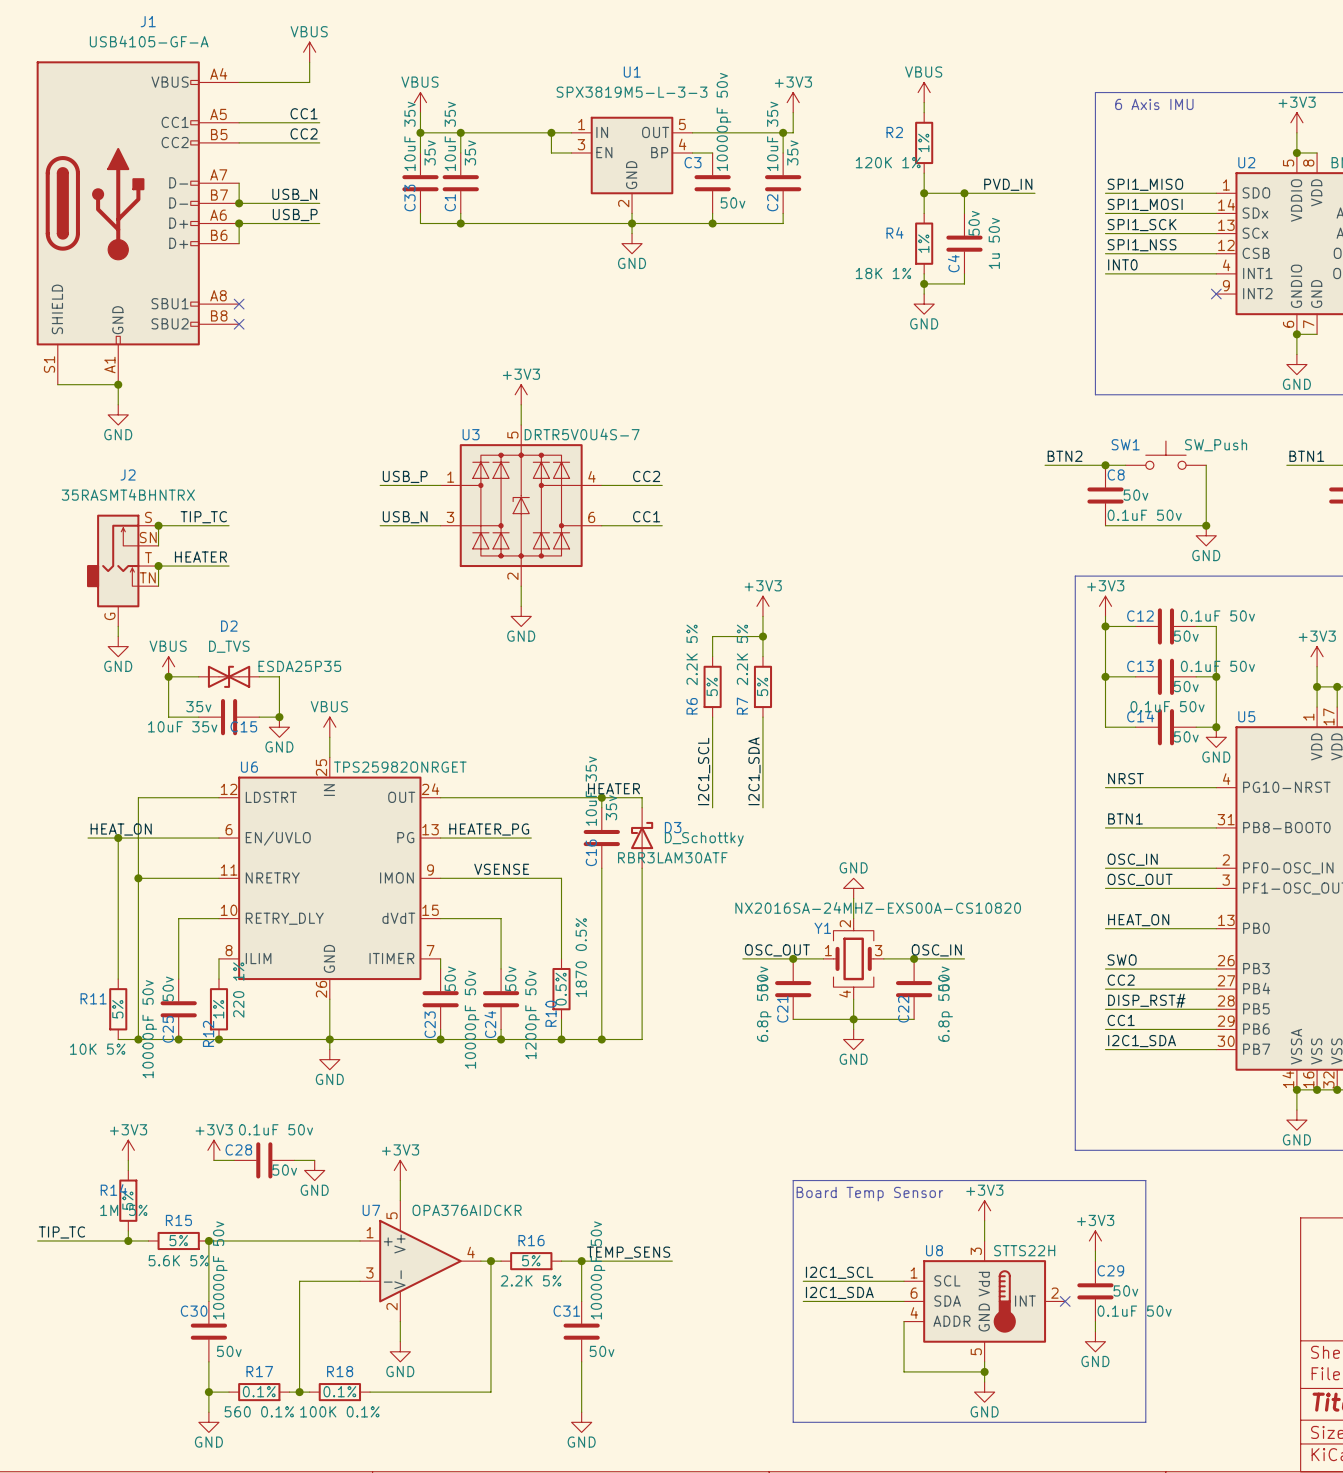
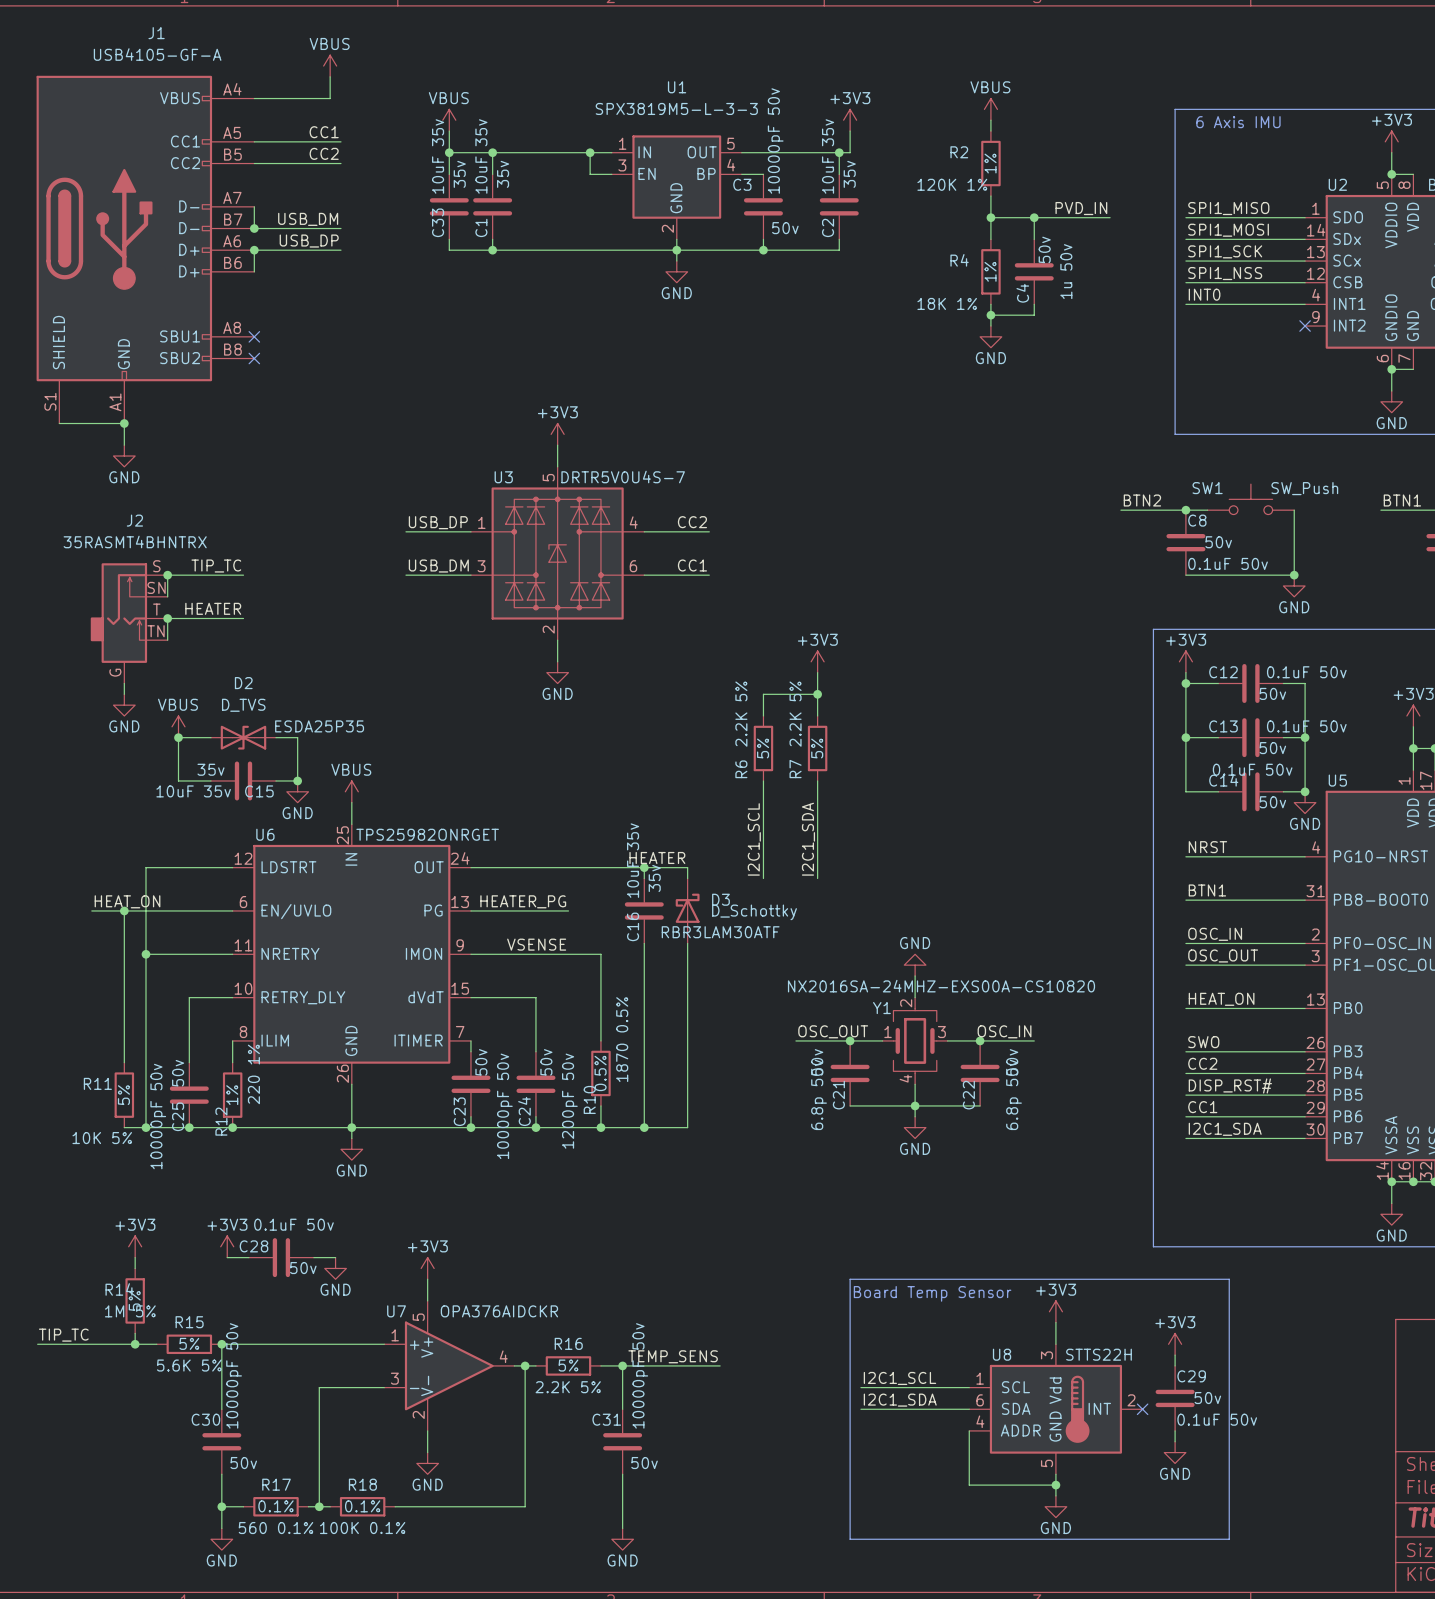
label: USB_N (294, 194) -> USB_DM (308, 219)
label: USB_P (295, 214) -> USB_DP (309, 241)
label: USB_P (405, 476) -> USB_DP (438, 522)
label: USB_N (405, 517) -> USB_DM (438, 566)

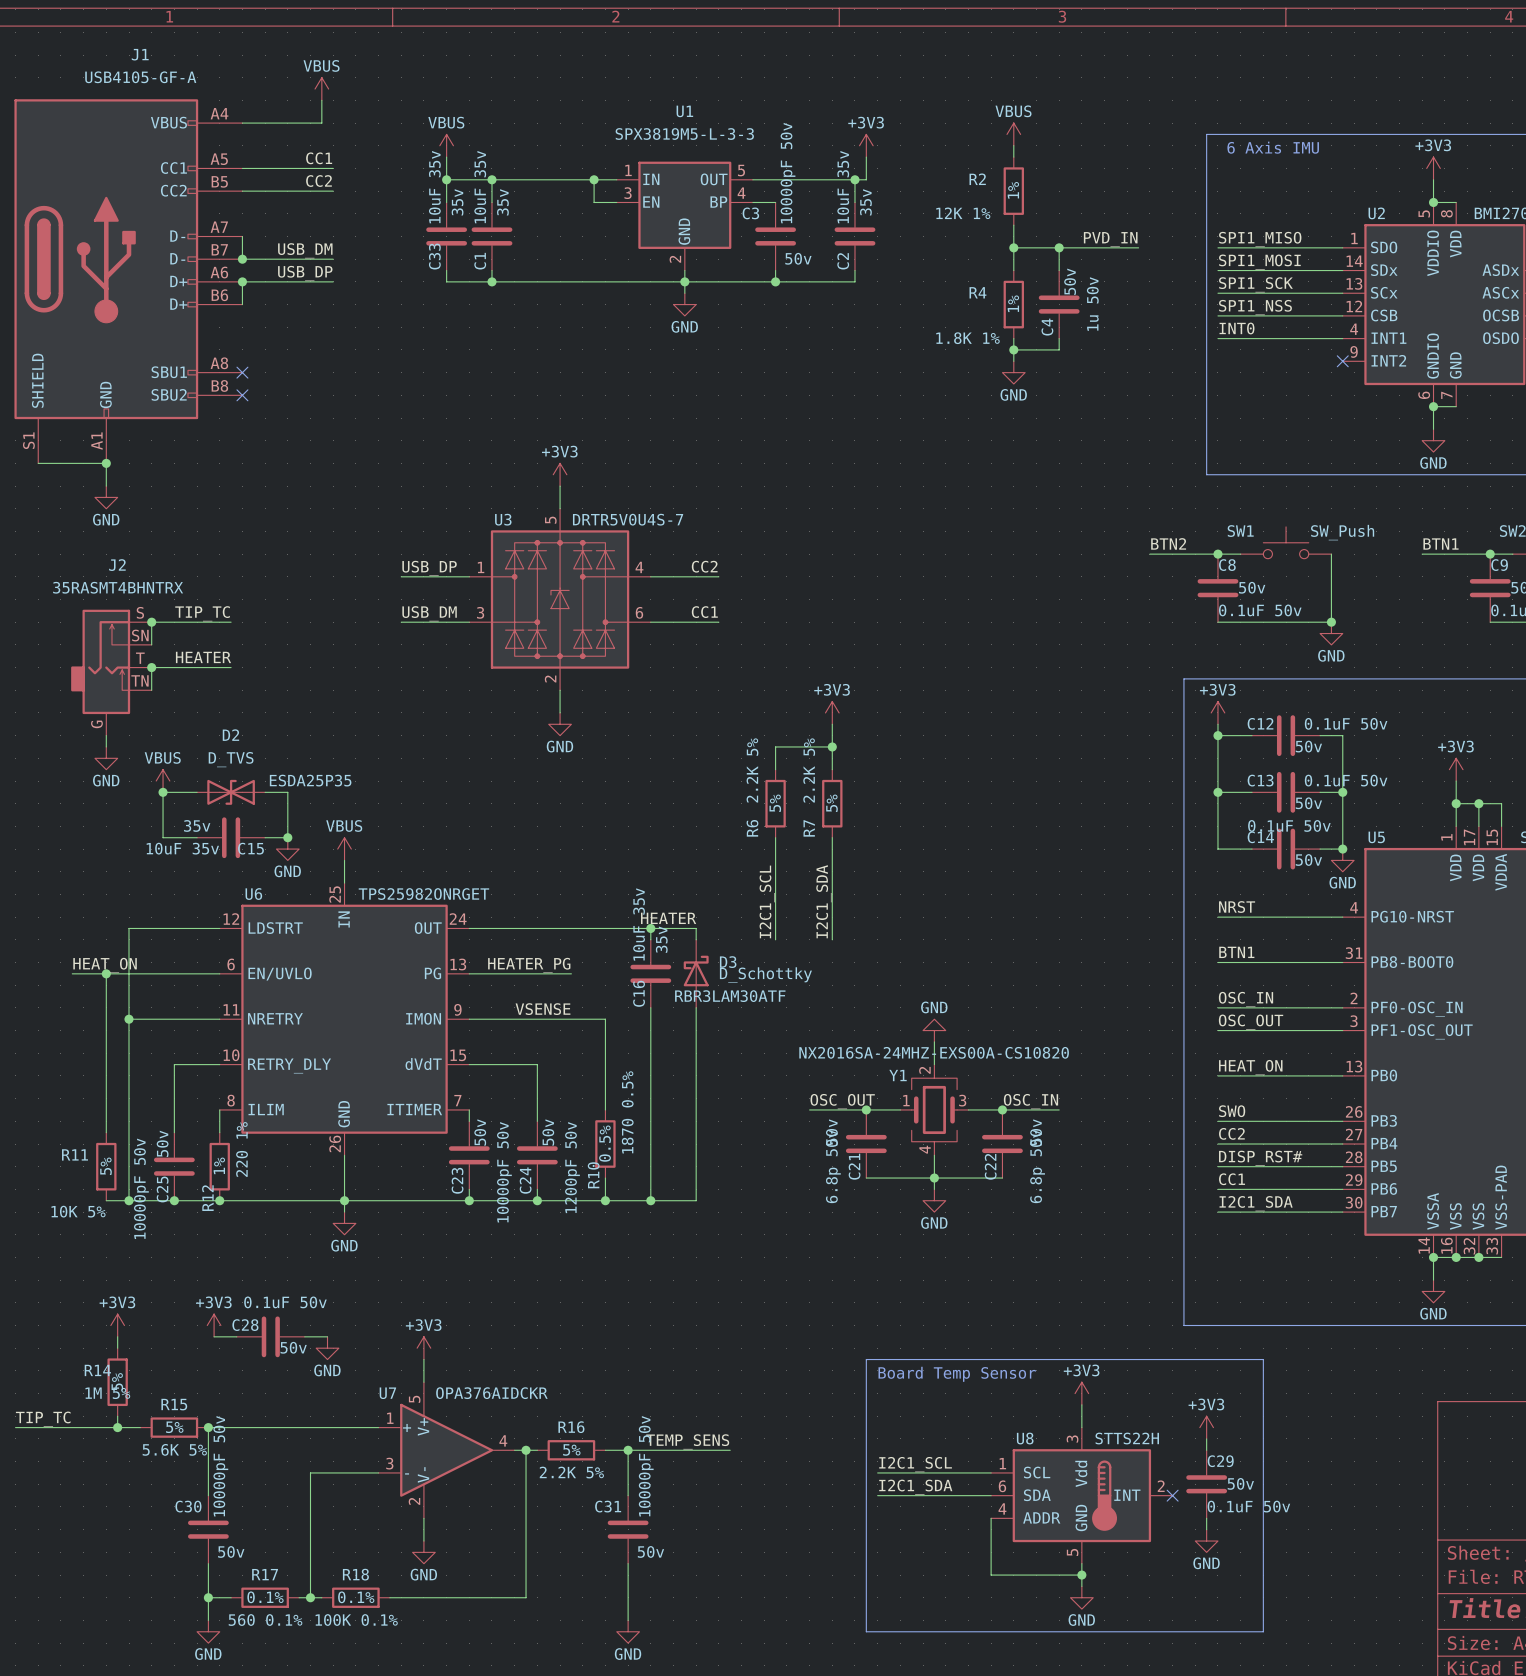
R2 value: 120K 1% (952, 184) -> 12K 1% (963, 213)
R4 value: 18K 1% (947, 303) -> 1.8K 1% (967, 338)

